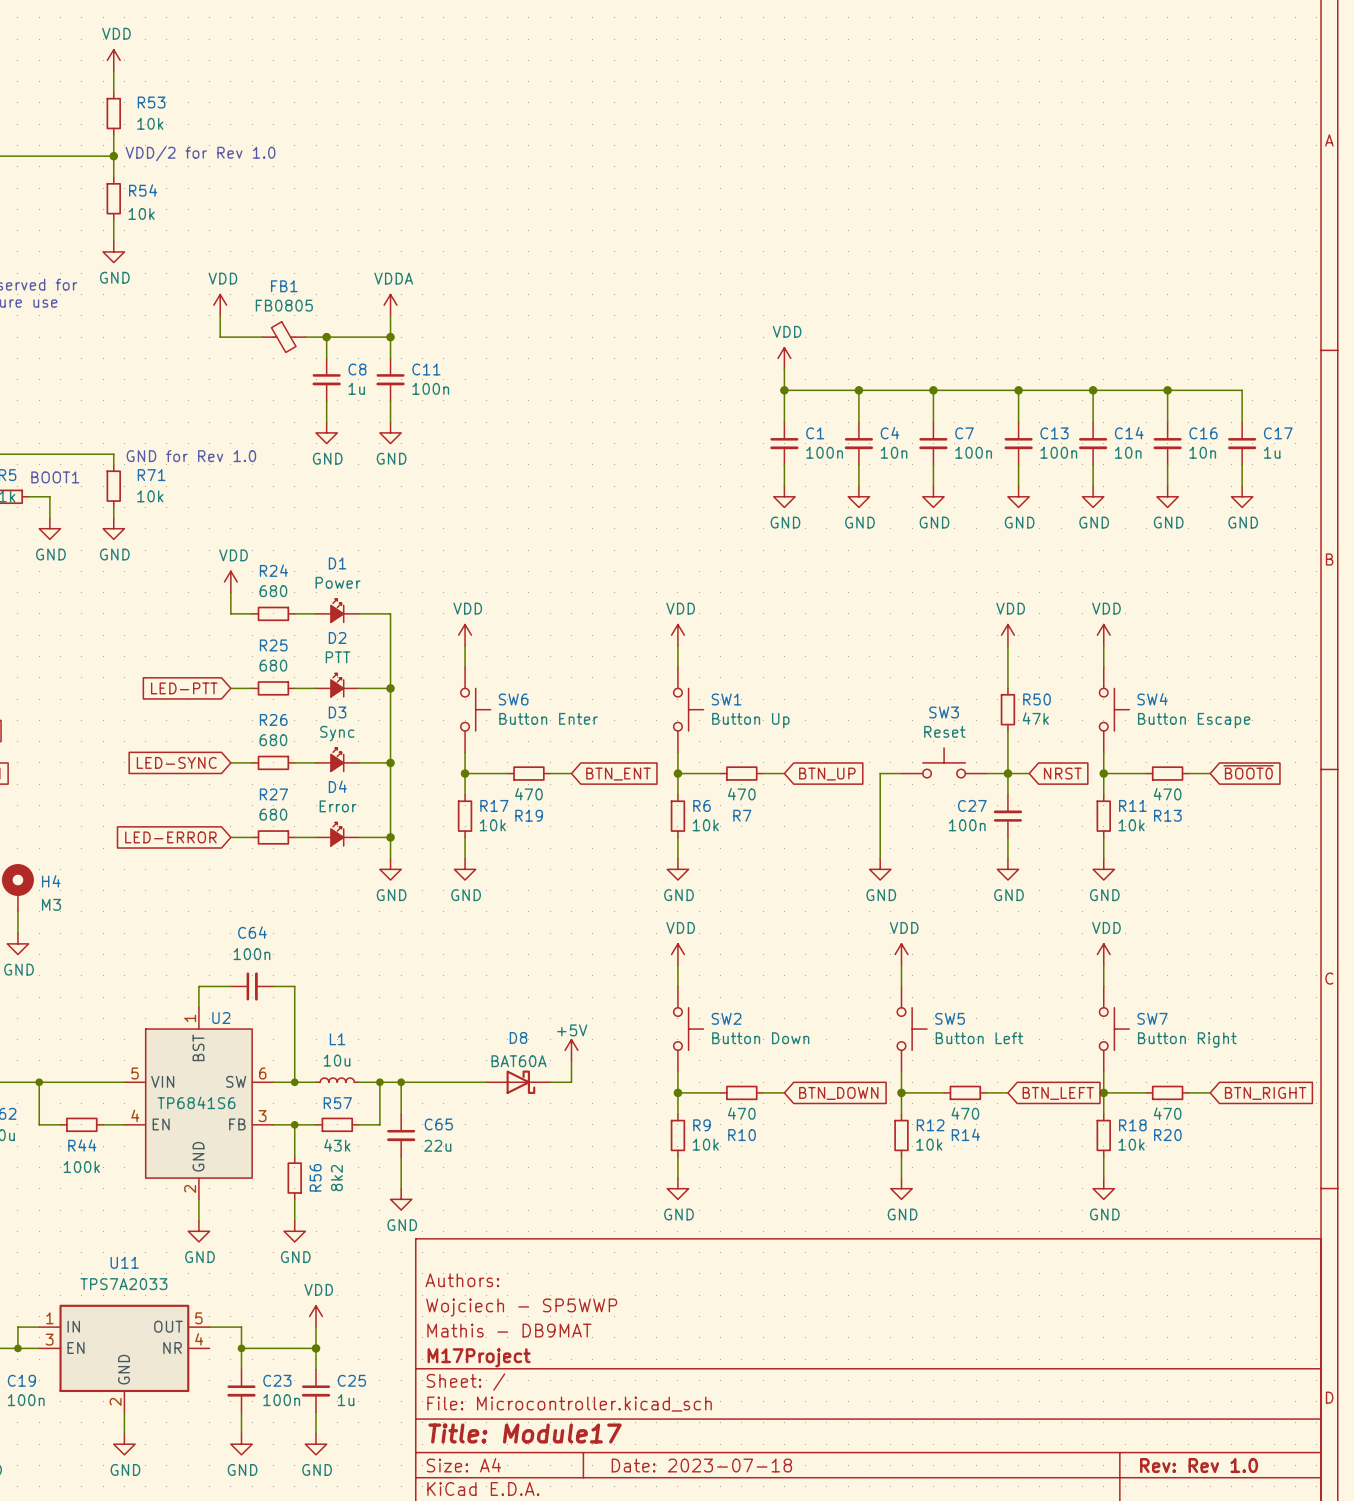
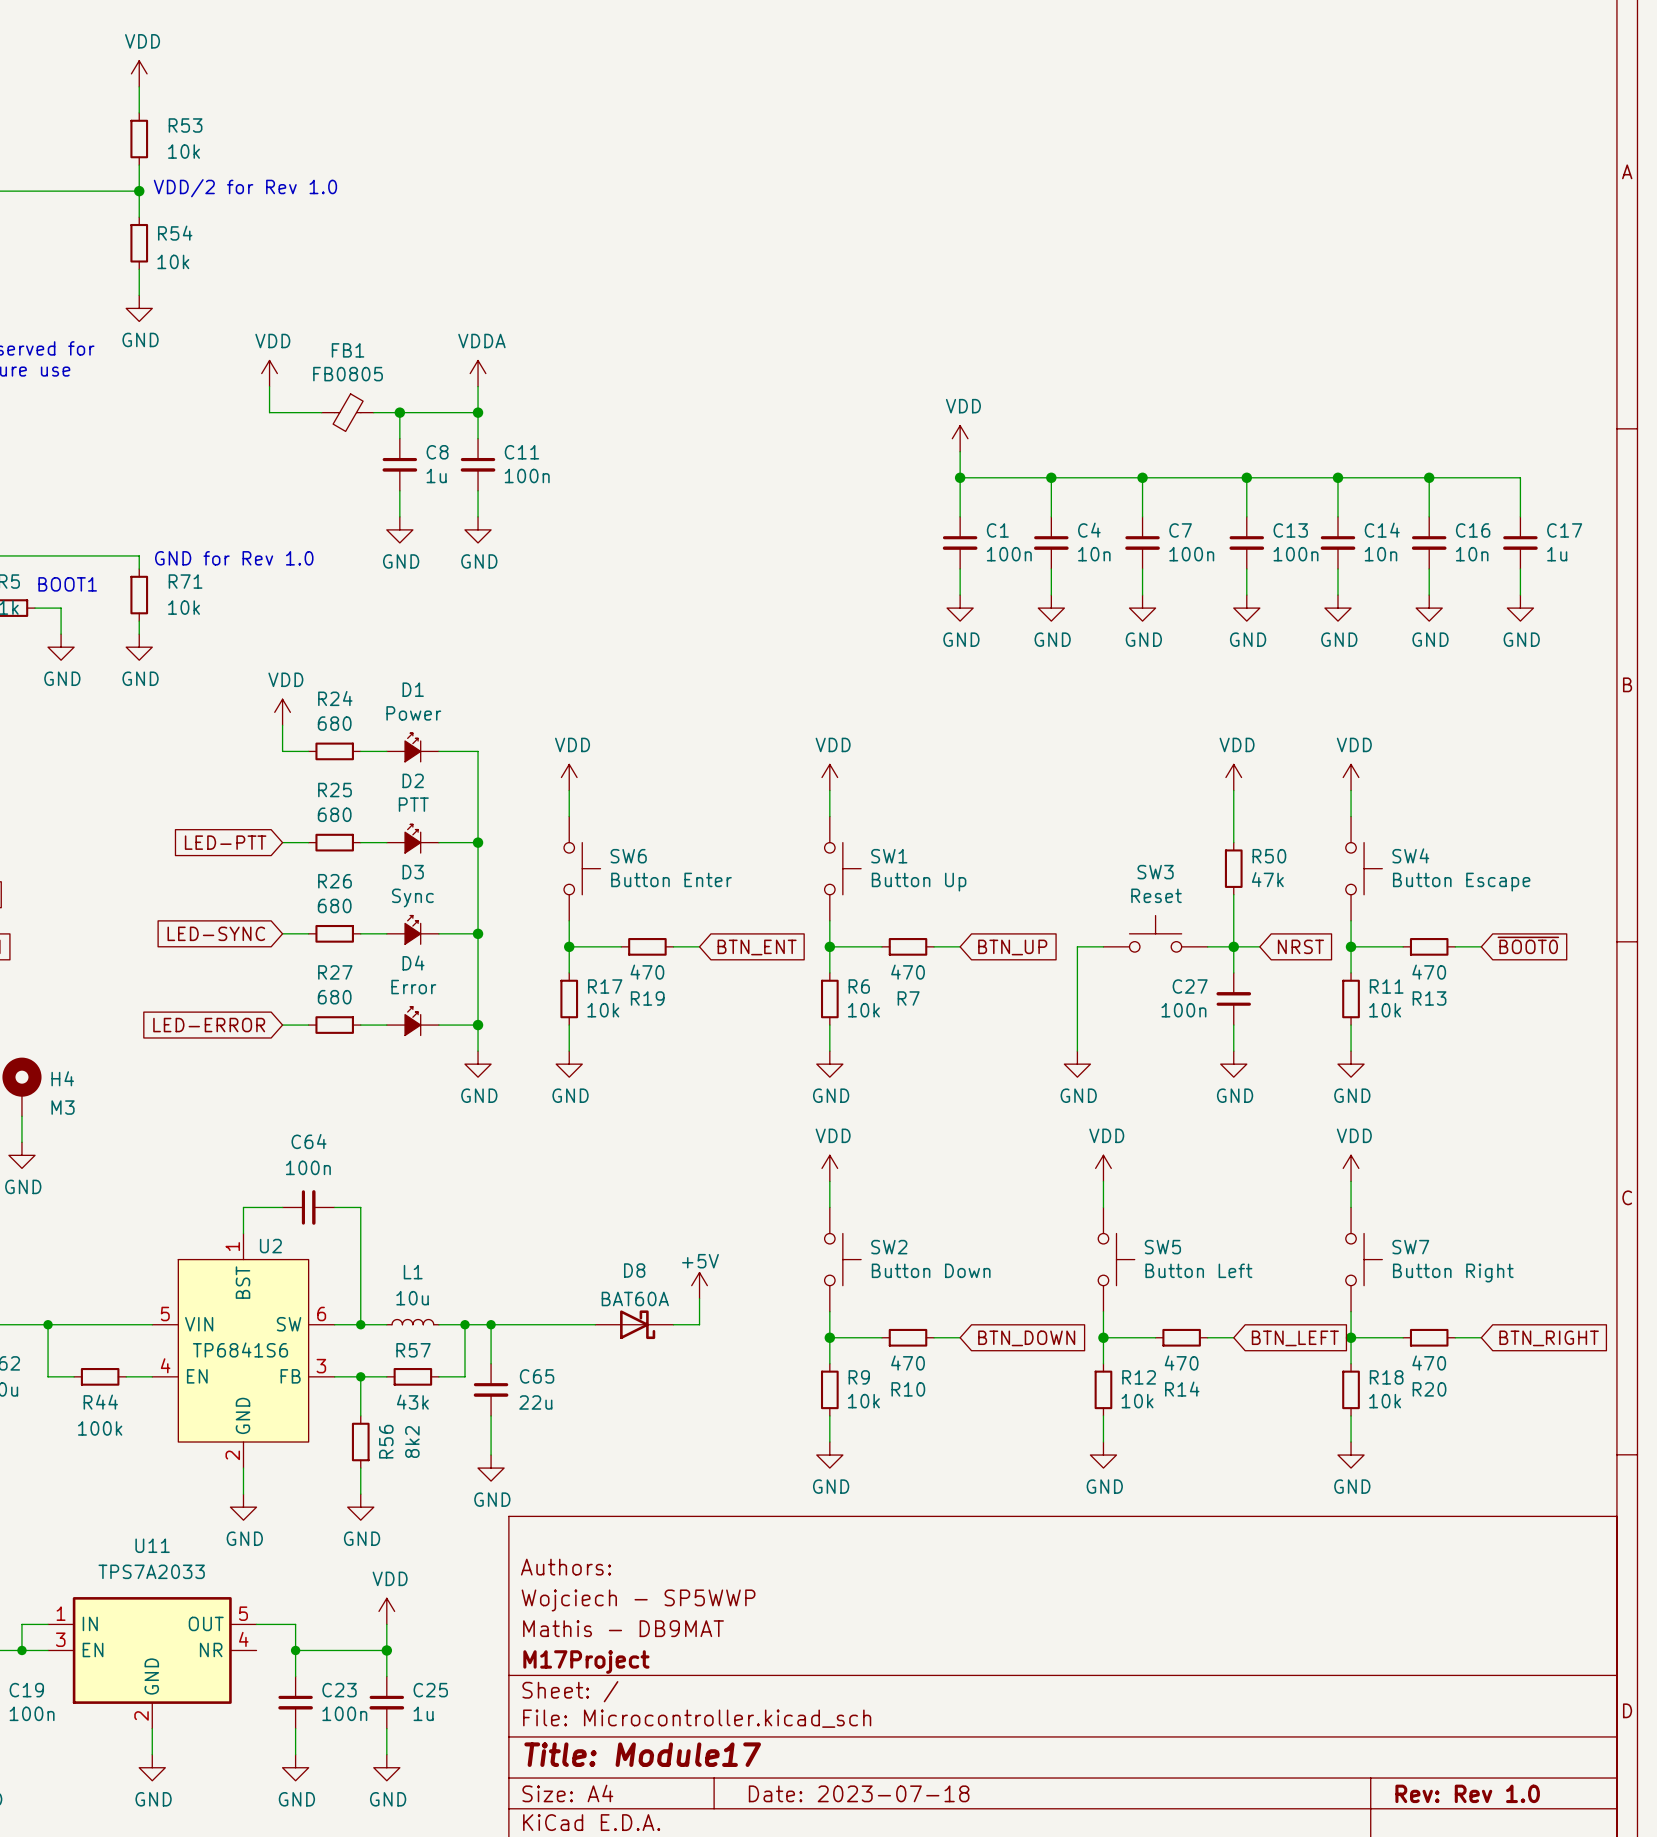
FB1 flip: as is (283, 337) -> left-right (348, 412)

